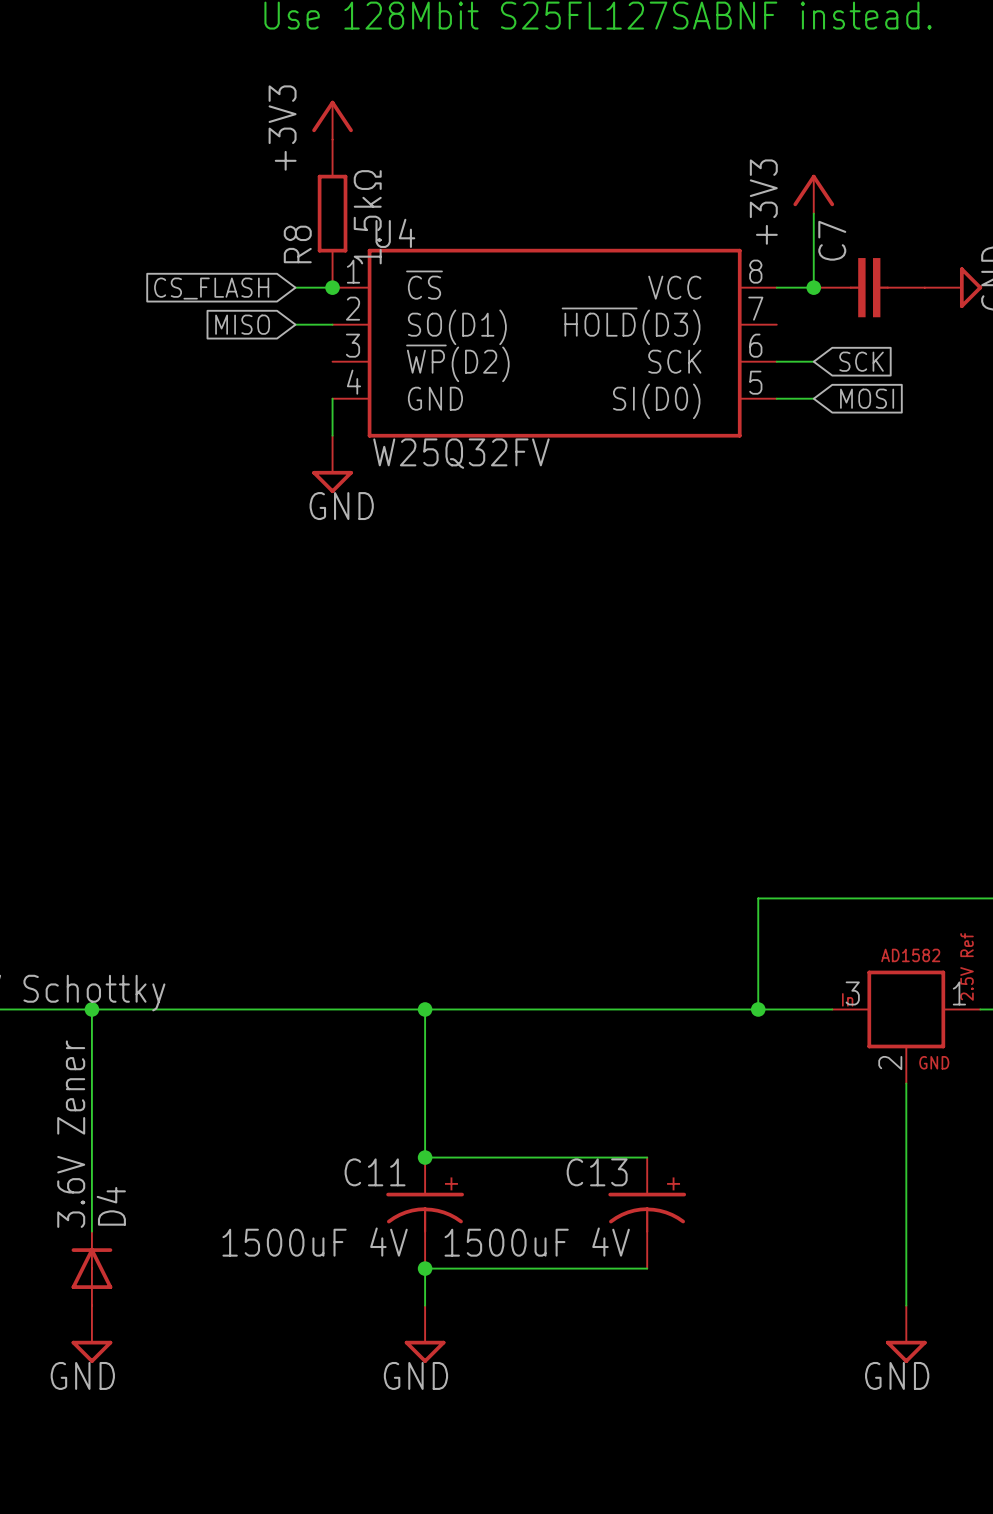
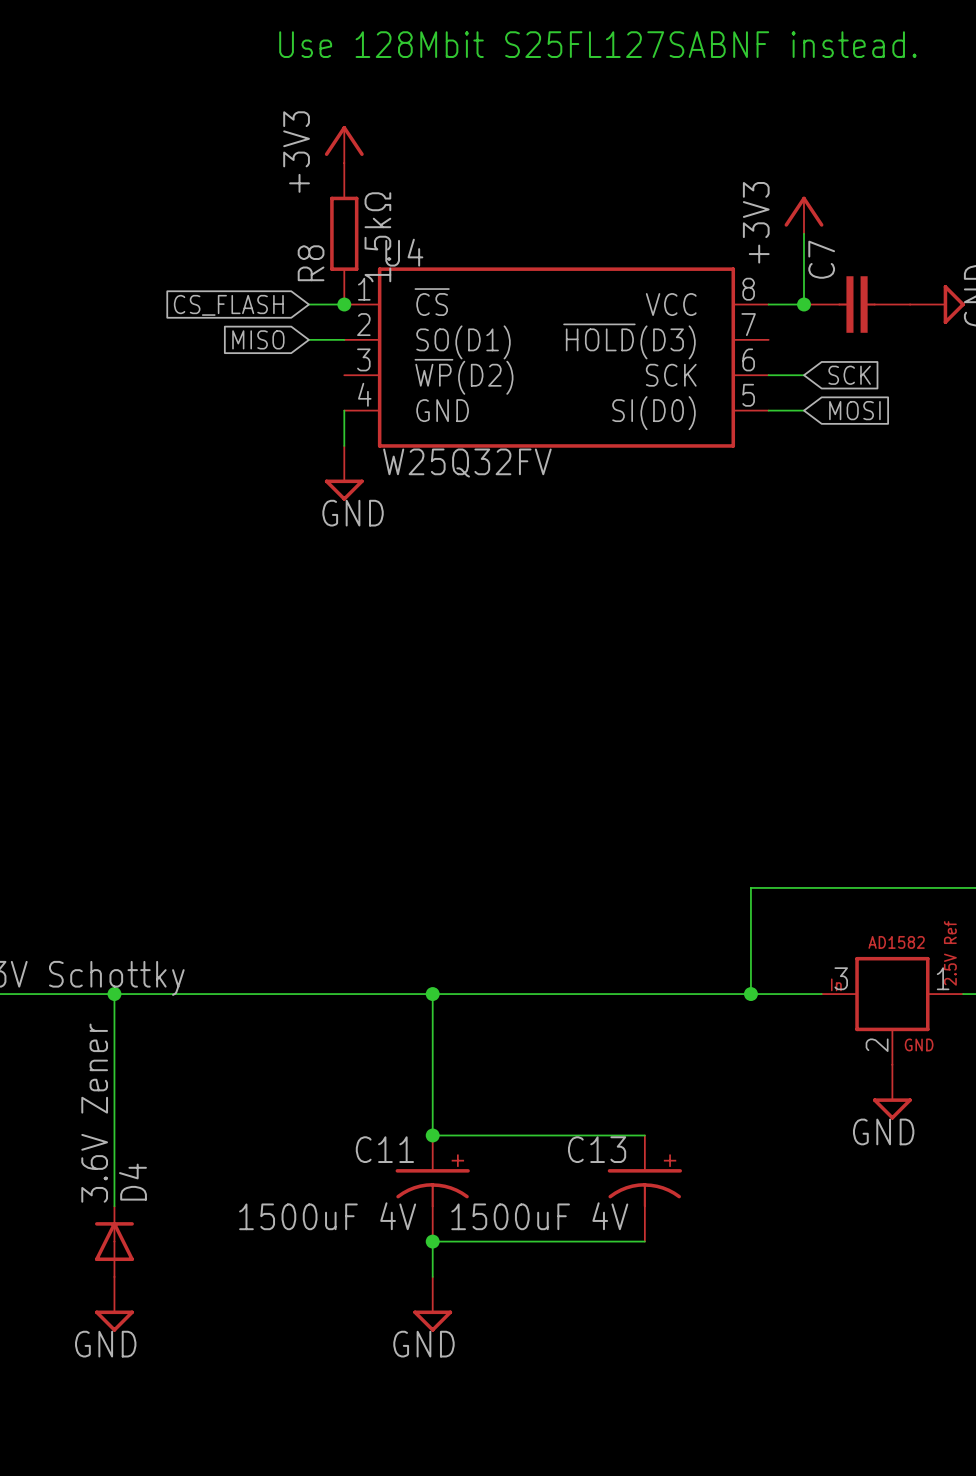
wire: (906, 1083) (906, 1305) -> none
power symbol position: GND (906, 1334) -> GND (892, 1092)

